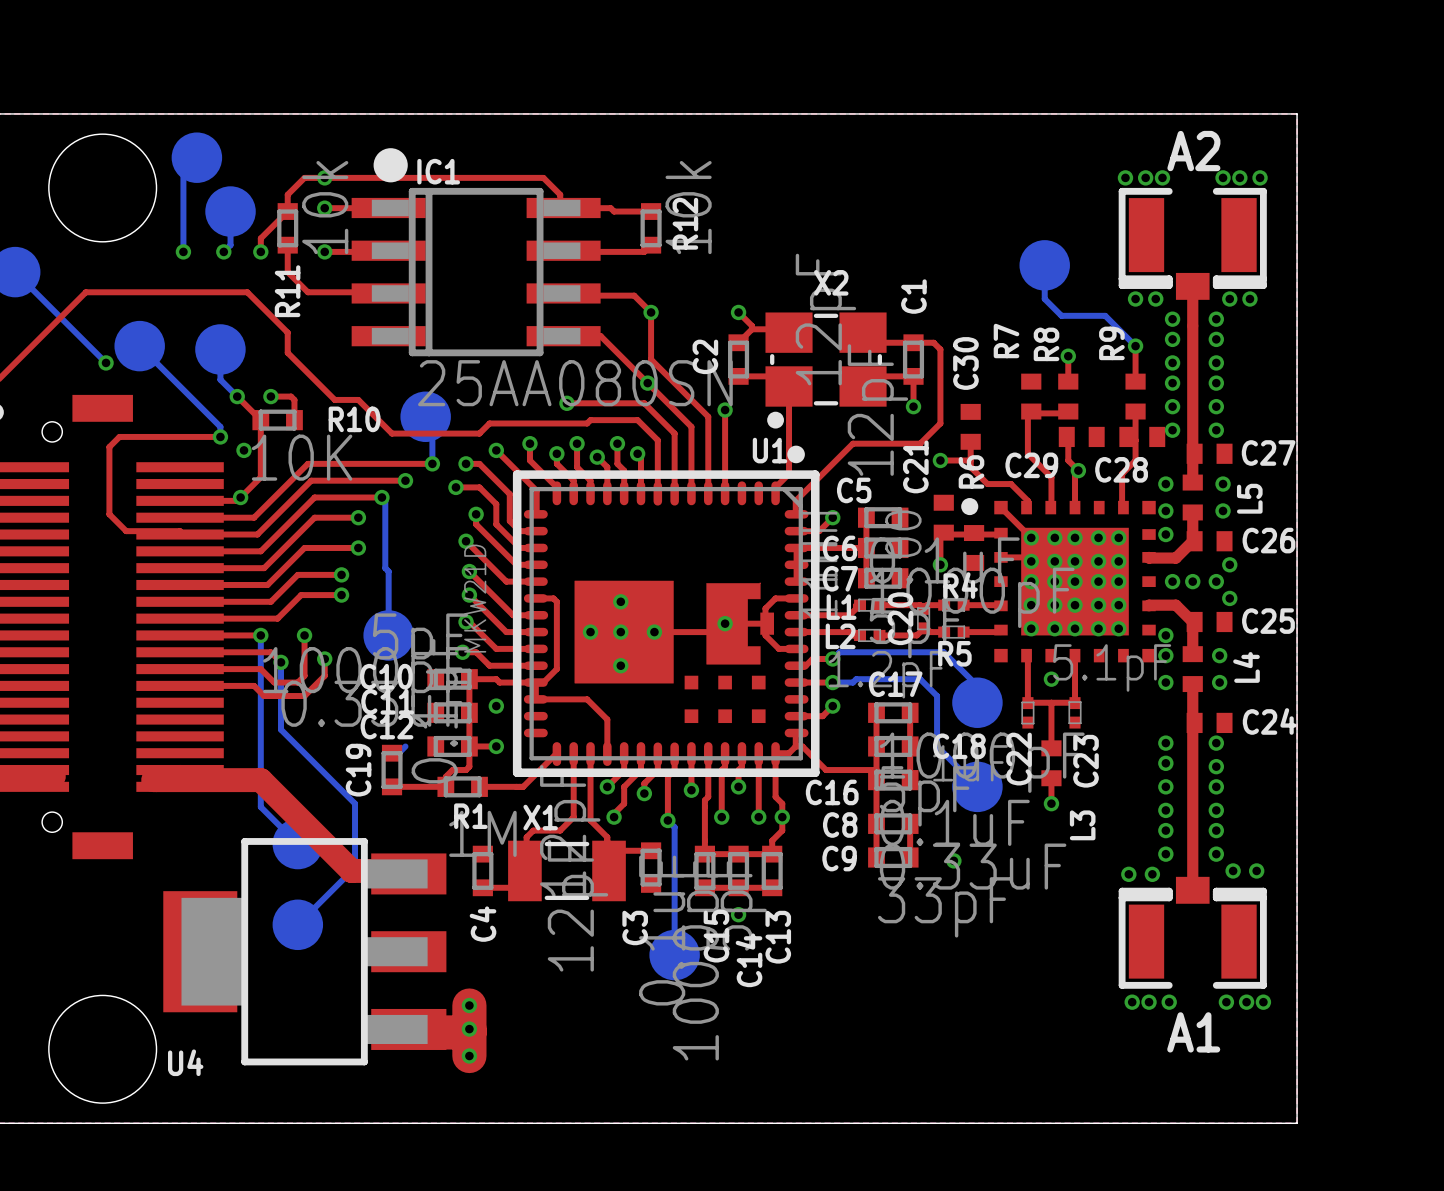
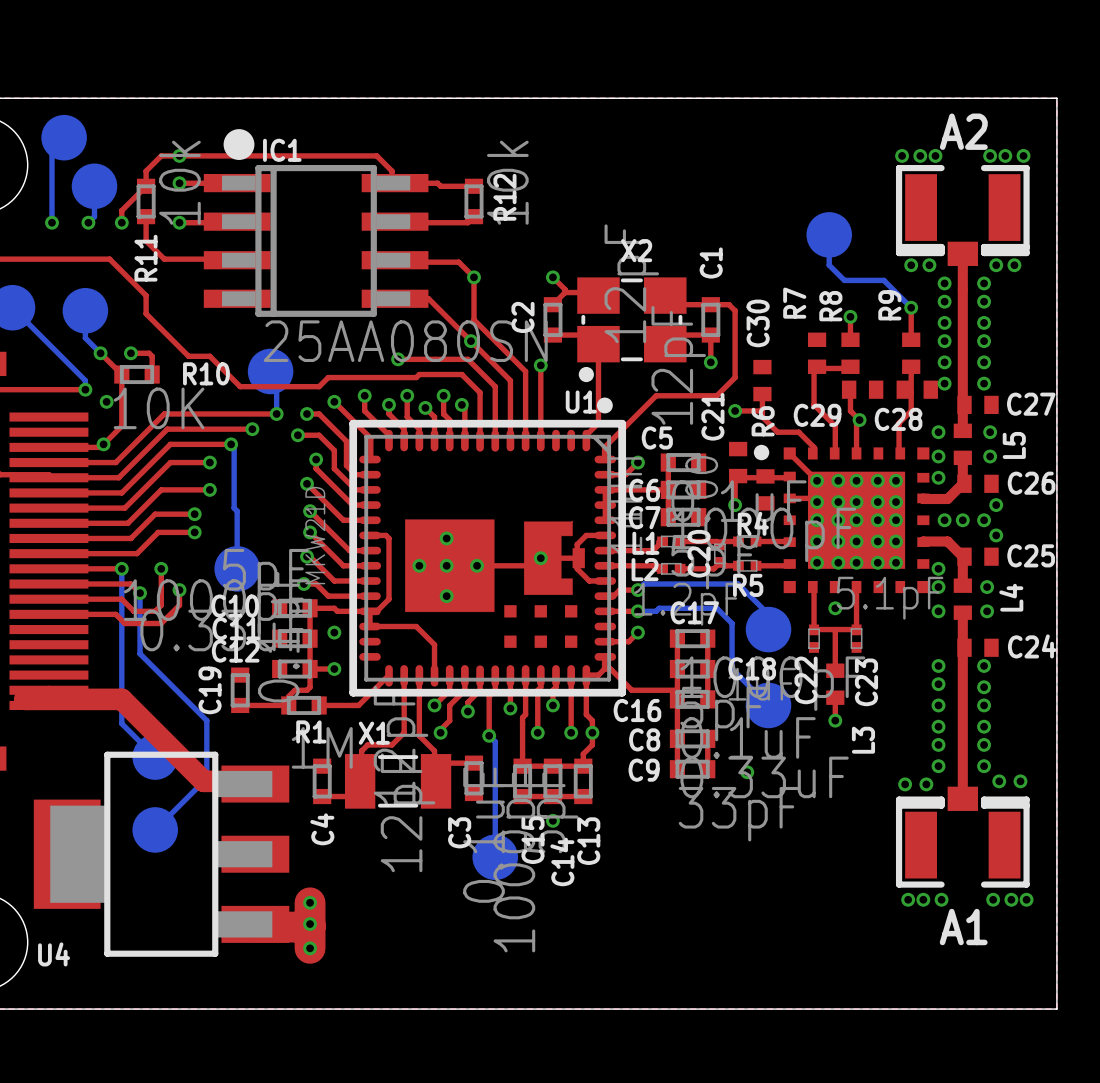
bottom track: (405, 746) (398, 753) -> none

